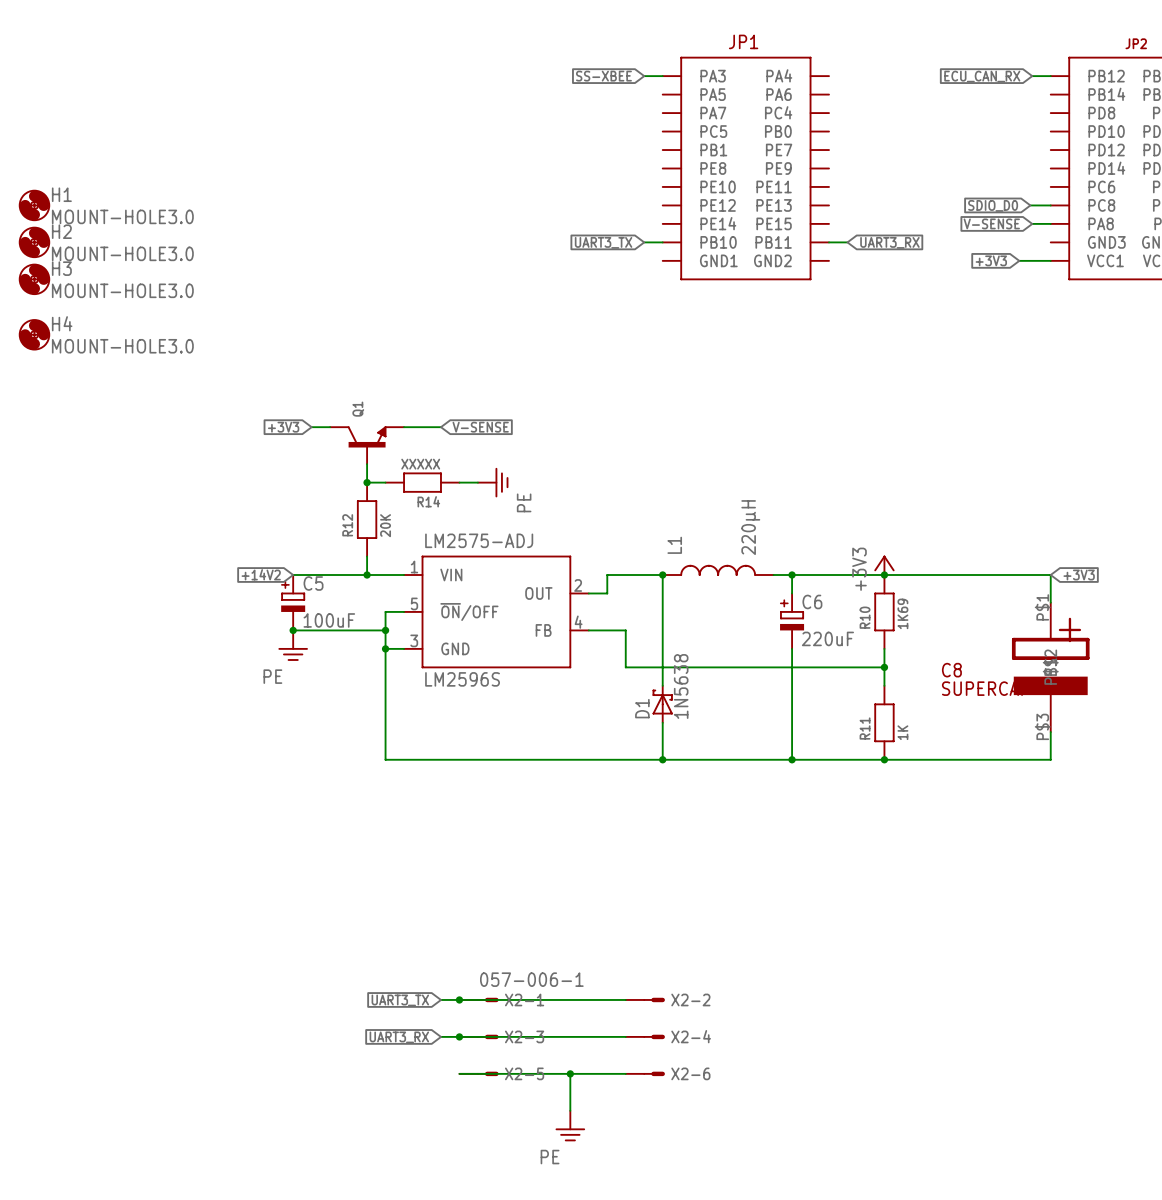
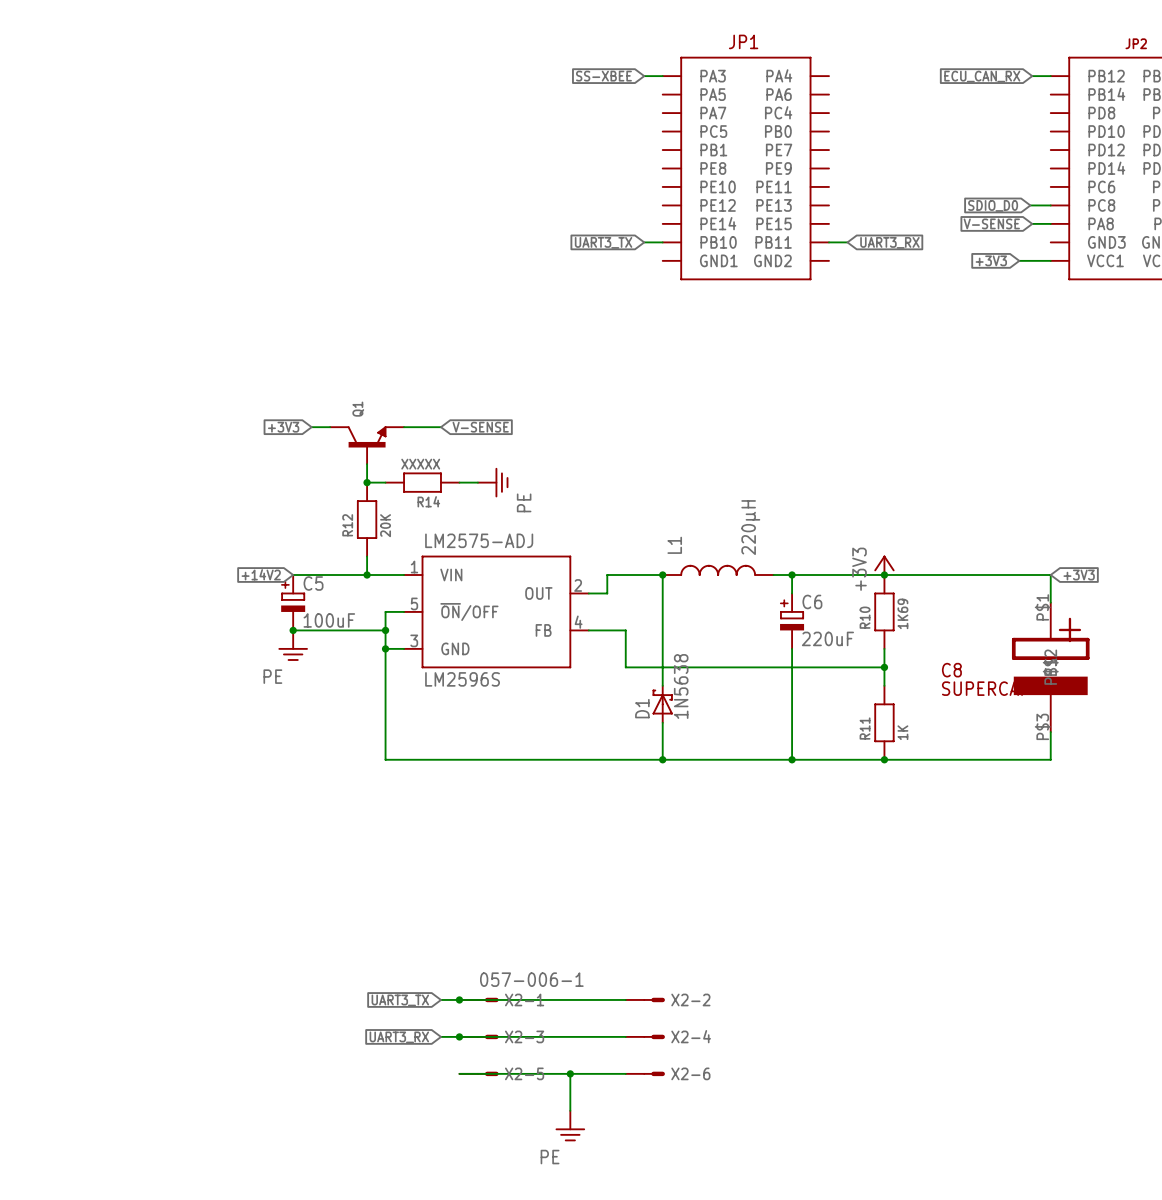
H1: MOUNT-HOLE3.0 (34, 205) -> none
H2: MOUNT-HOLE3.0 (34, 242) -> none
H3: MOUNT-HOLE3.0 (34, 279) -> none
H4: MOUNT-HOLE3.0 (34, 334) -> none

